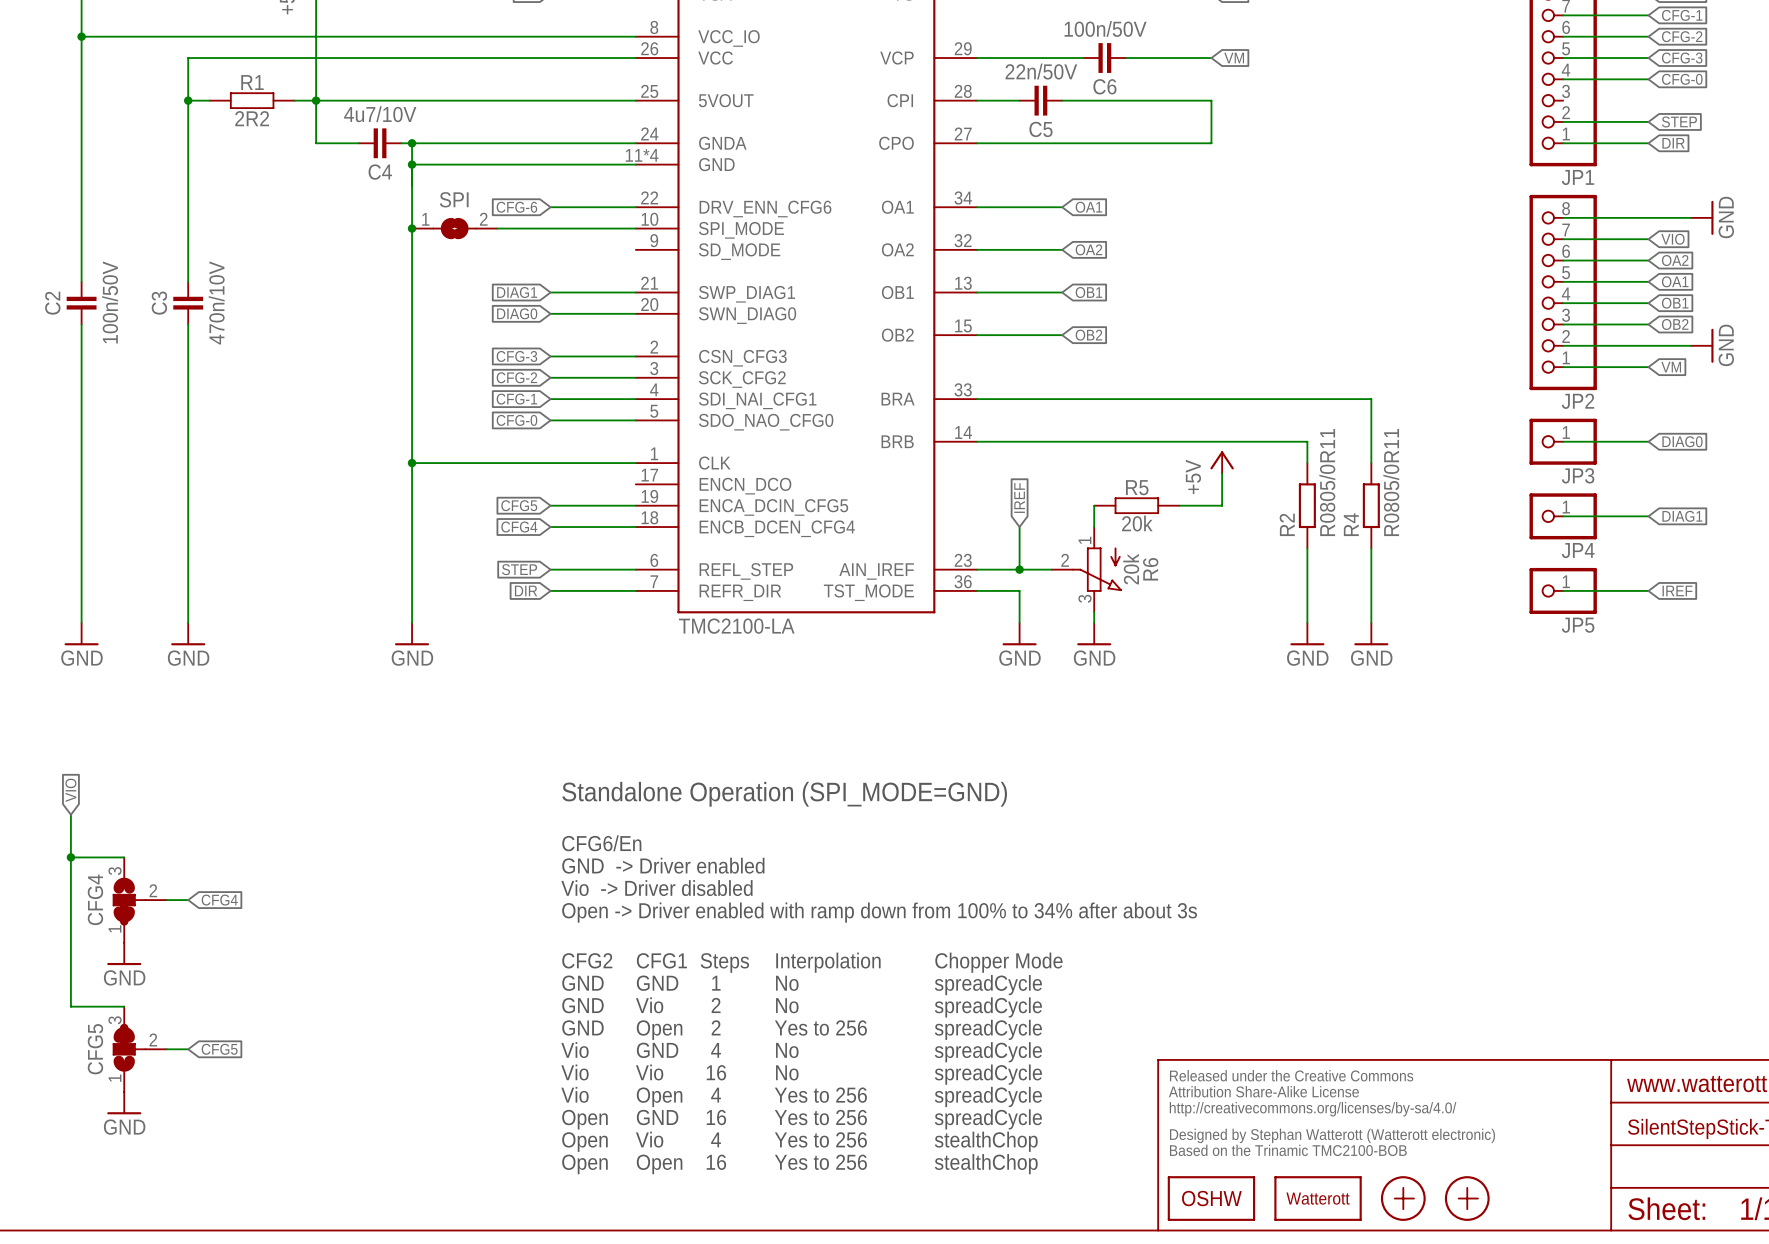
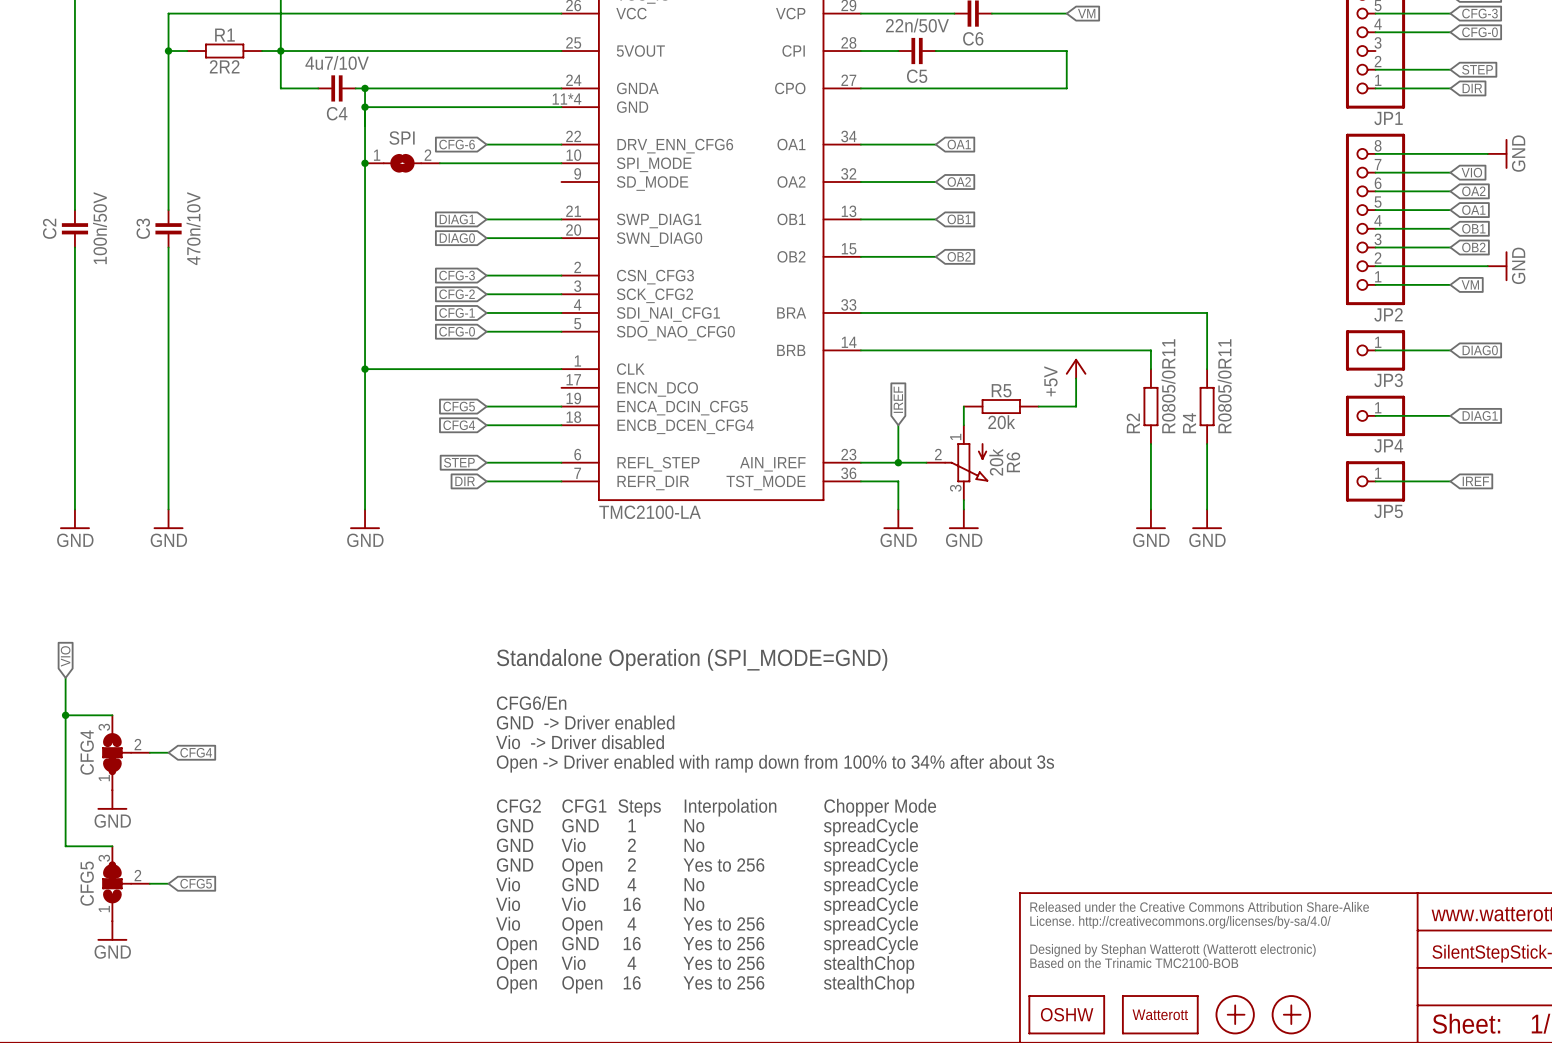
text: Released under the Creative Commons (1291, 1075) -> License. http://creativecommons.org/licenses/by-sa/4.0/ (1180, 922)
text: none -> Released under the Creative Commons Attribution Share-Alike (1199, 906)
text: Attribution Share-Alike License (1263, 1091) -> none
text: http://creativecommons.org/licenses/by-sa/4.0/ (1313, 1109) -> Designed by Stephan Watterott (Watterott electronic) (1173, 950)
text: Designed by Stephan Watterott (Watterott electronic) (1332, 1135) -> Based on the Trinamic TMC2100-BOB (1134, 963)
text: Based on the Trinamic TMC2100-BOB (1288, 1150) -> none

